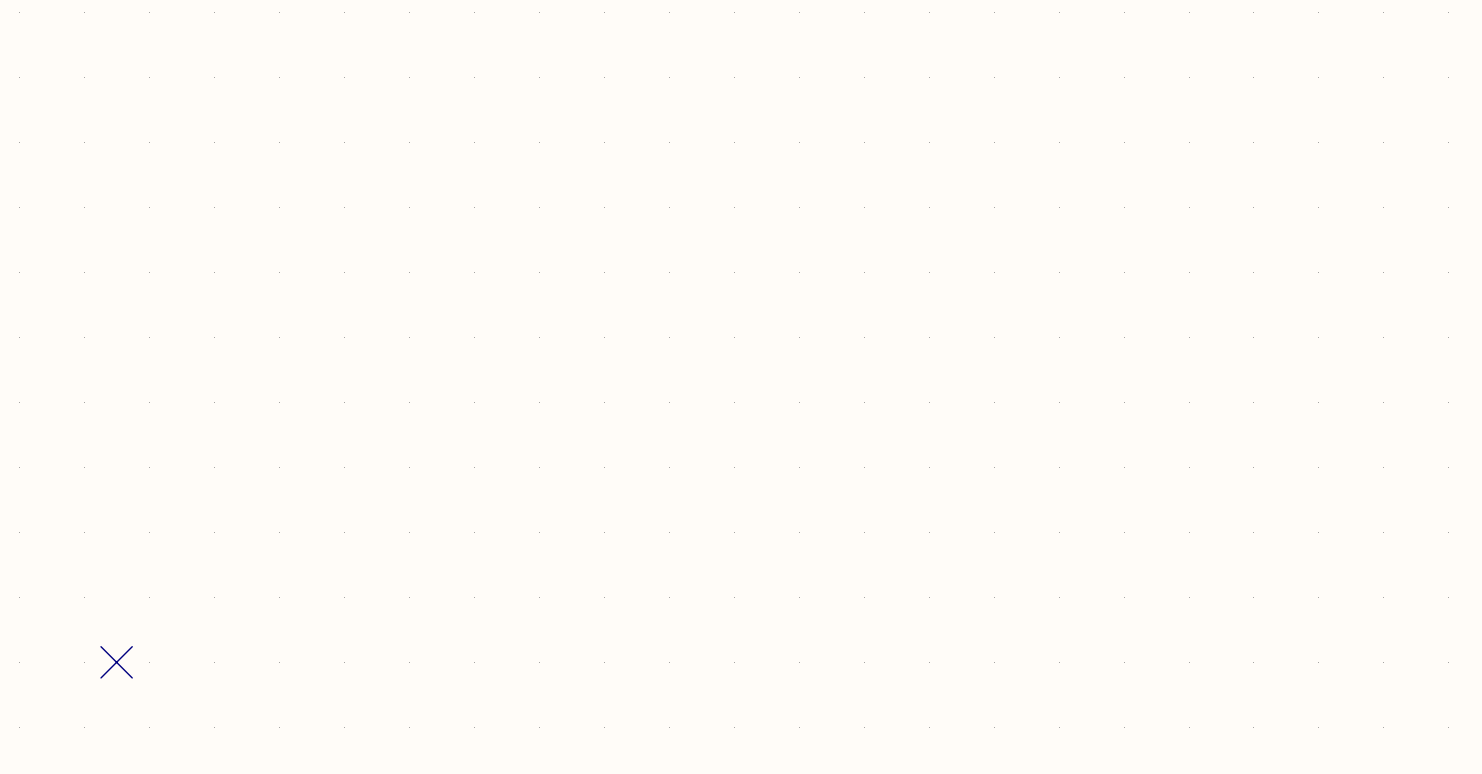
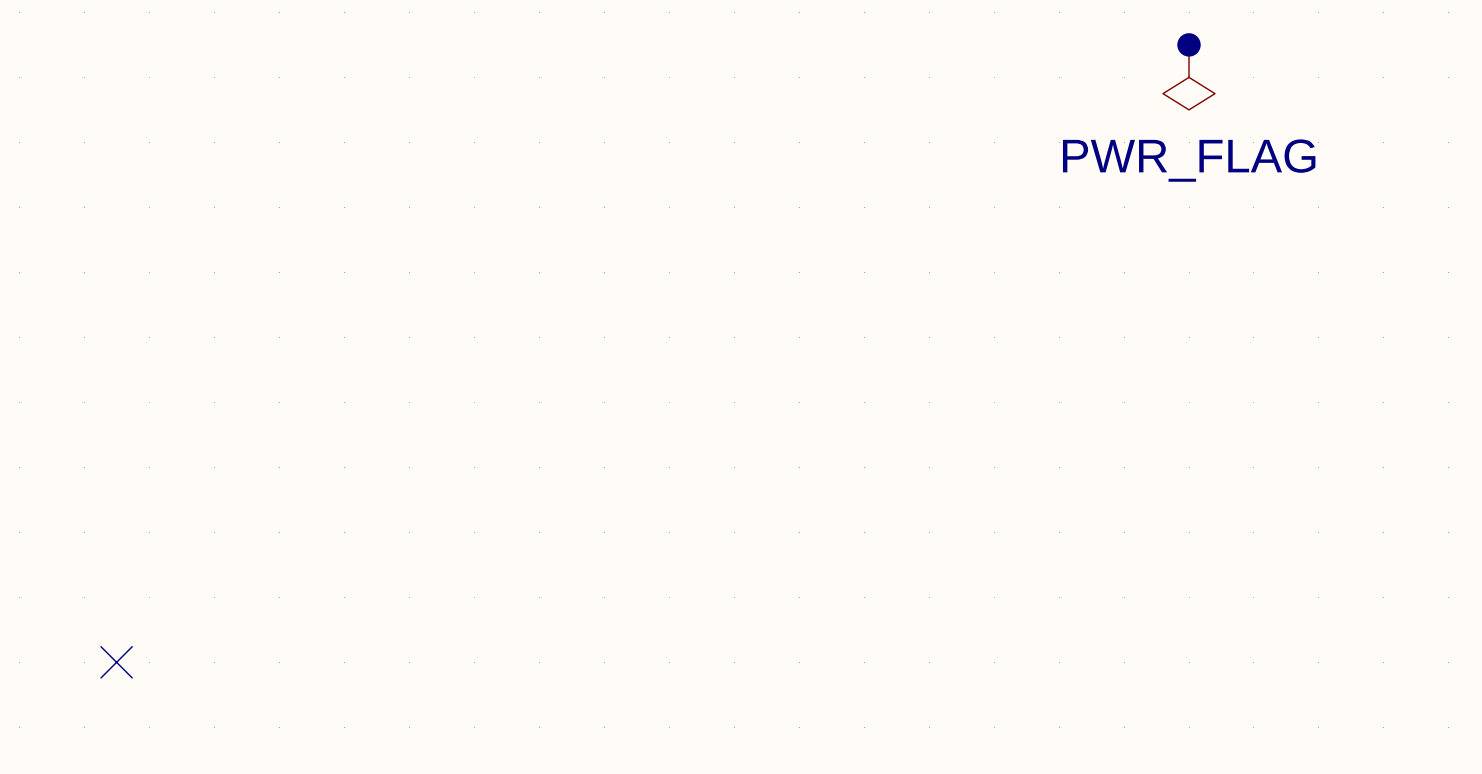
junction: none -> (1189, 44)
power symbol: none -> PWR_FLAG (1189, 77)

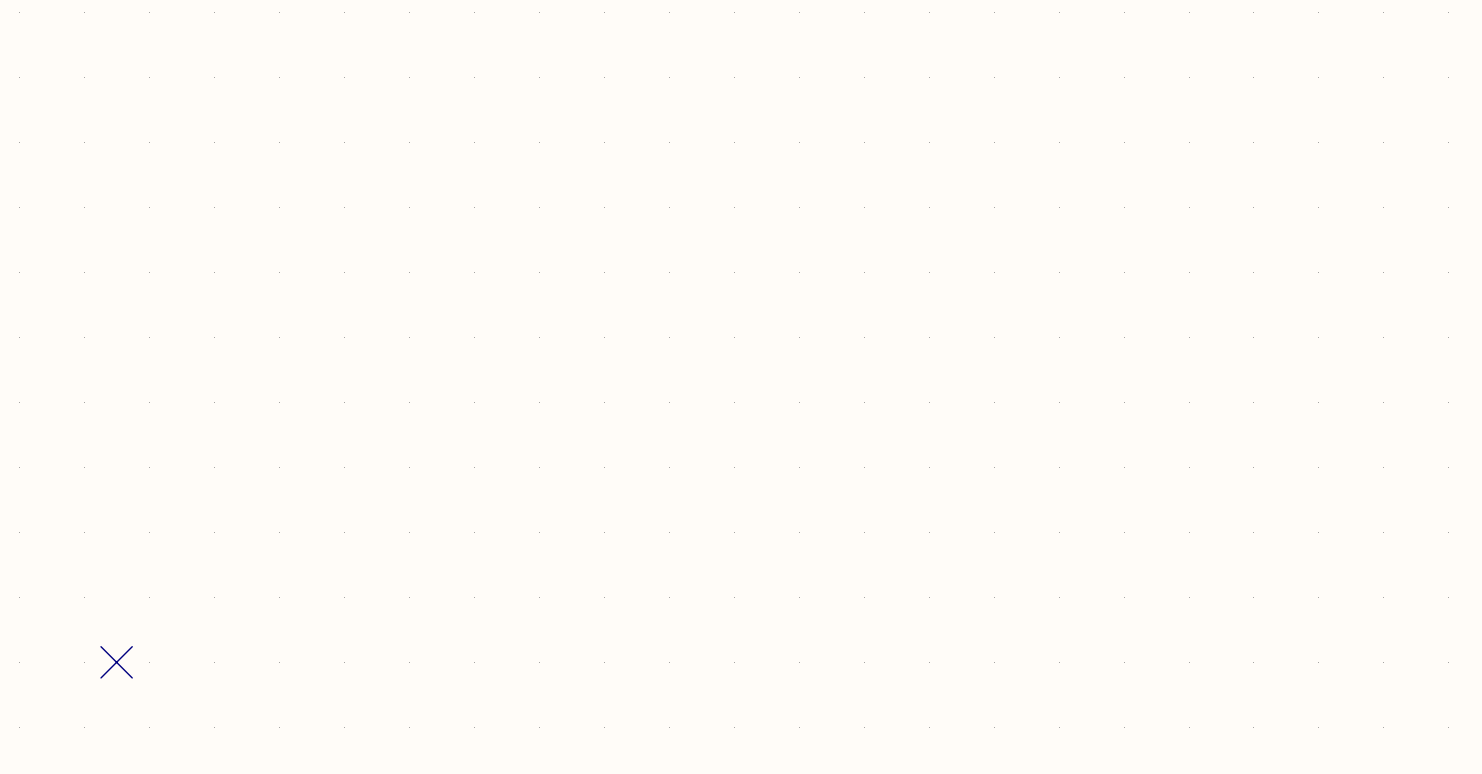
junction: (1189, 44) -> none
power symbol: PWR_FLAG (1189, 77) -> none

